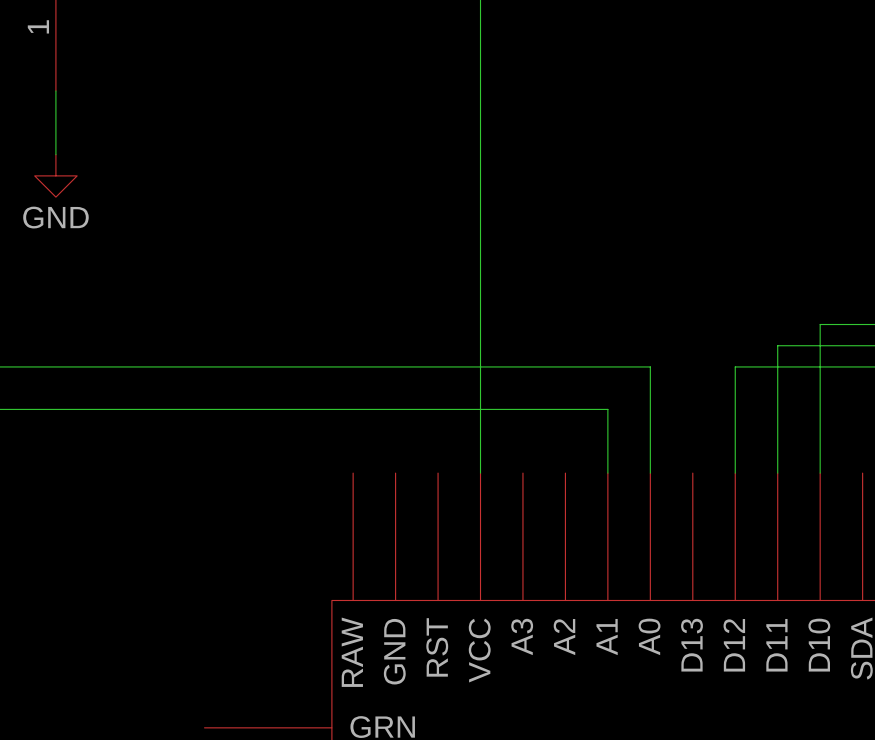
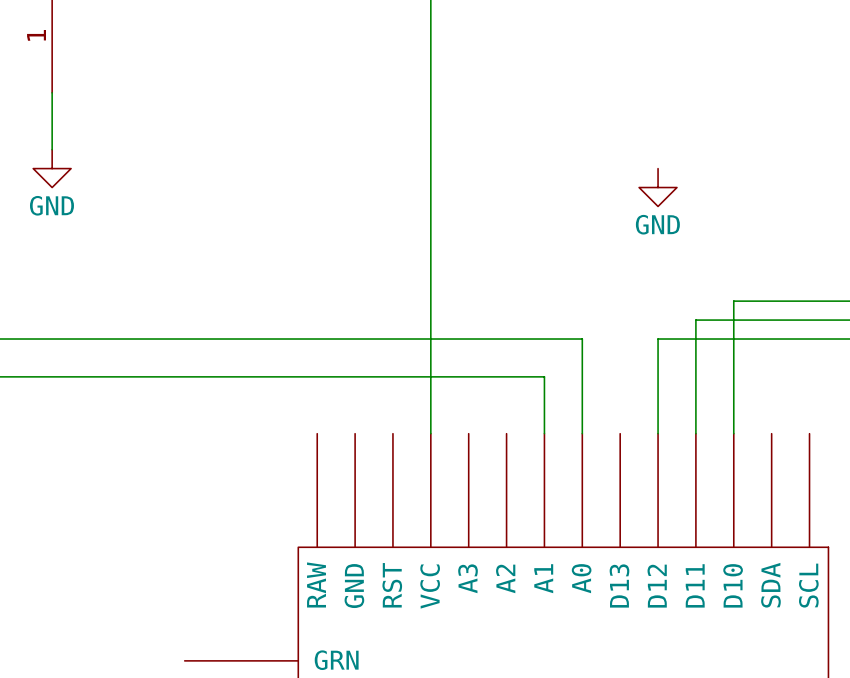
power symbol: none -> GND (658, 187)

